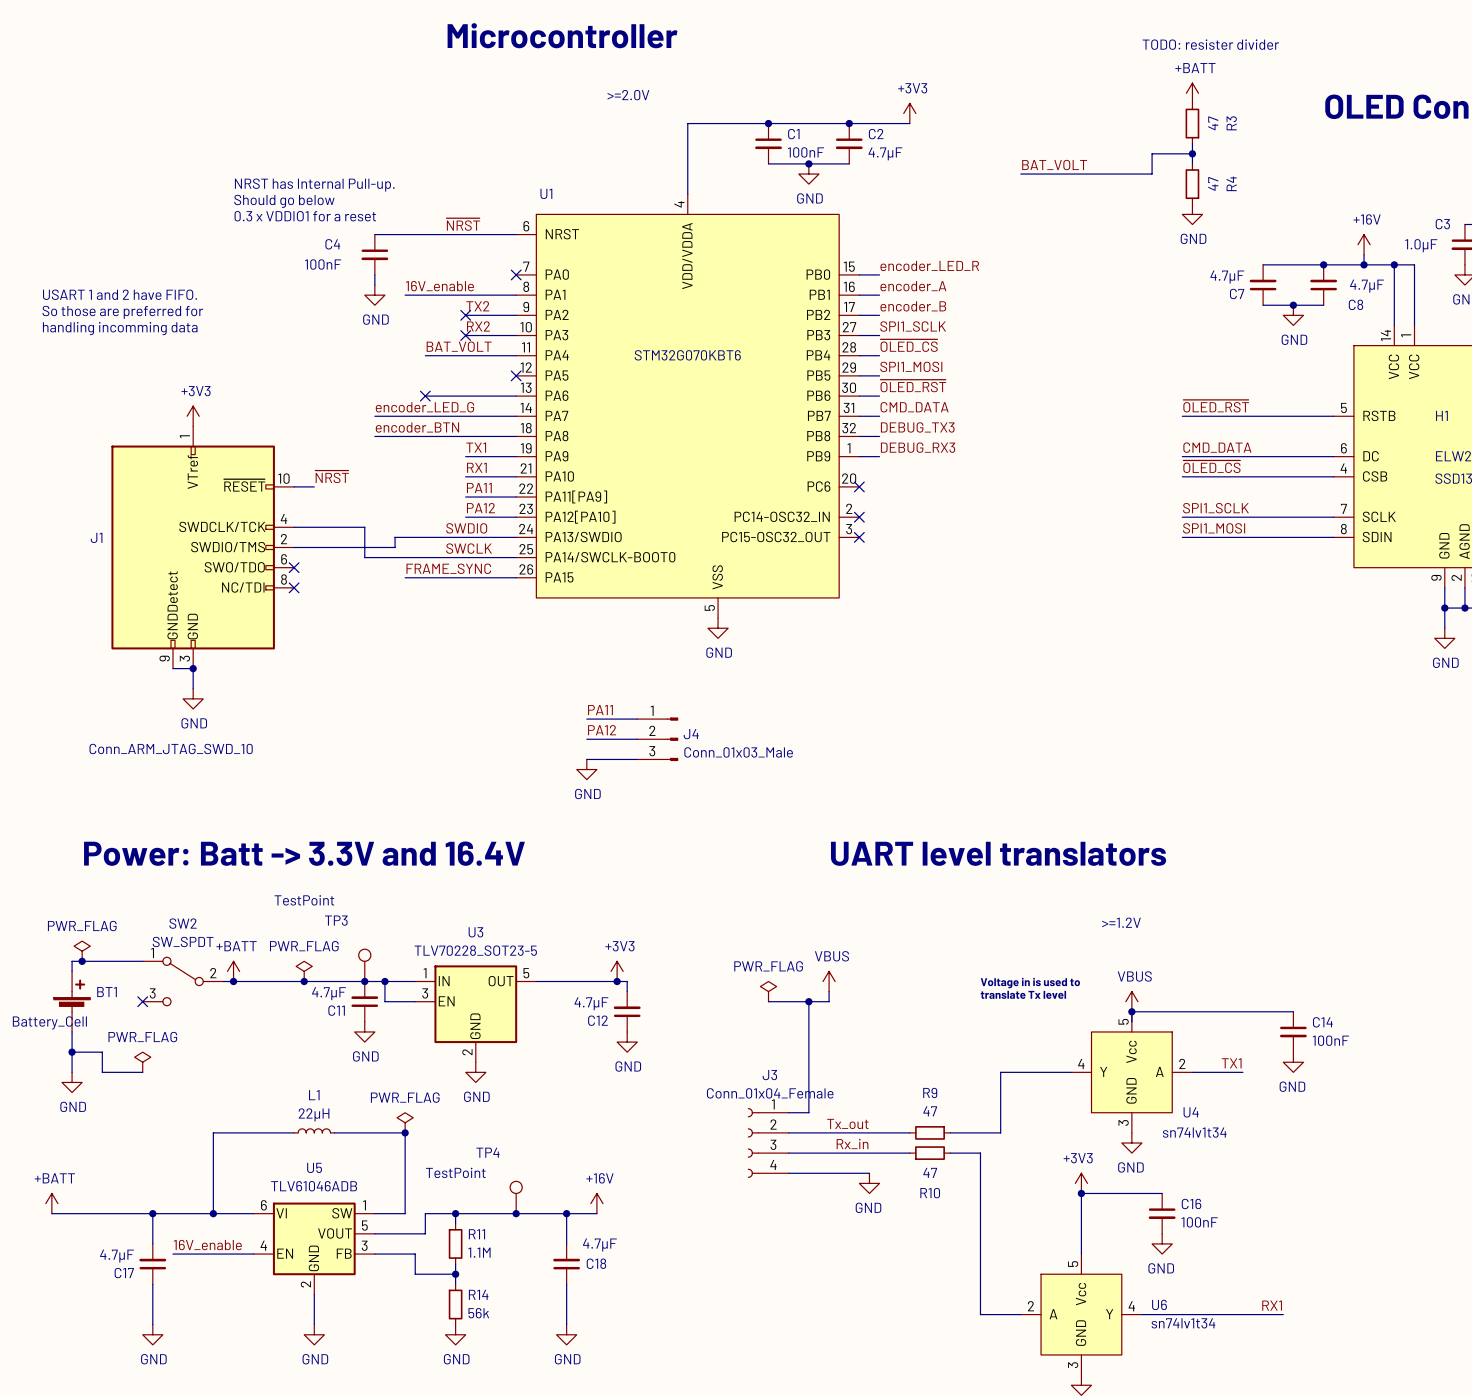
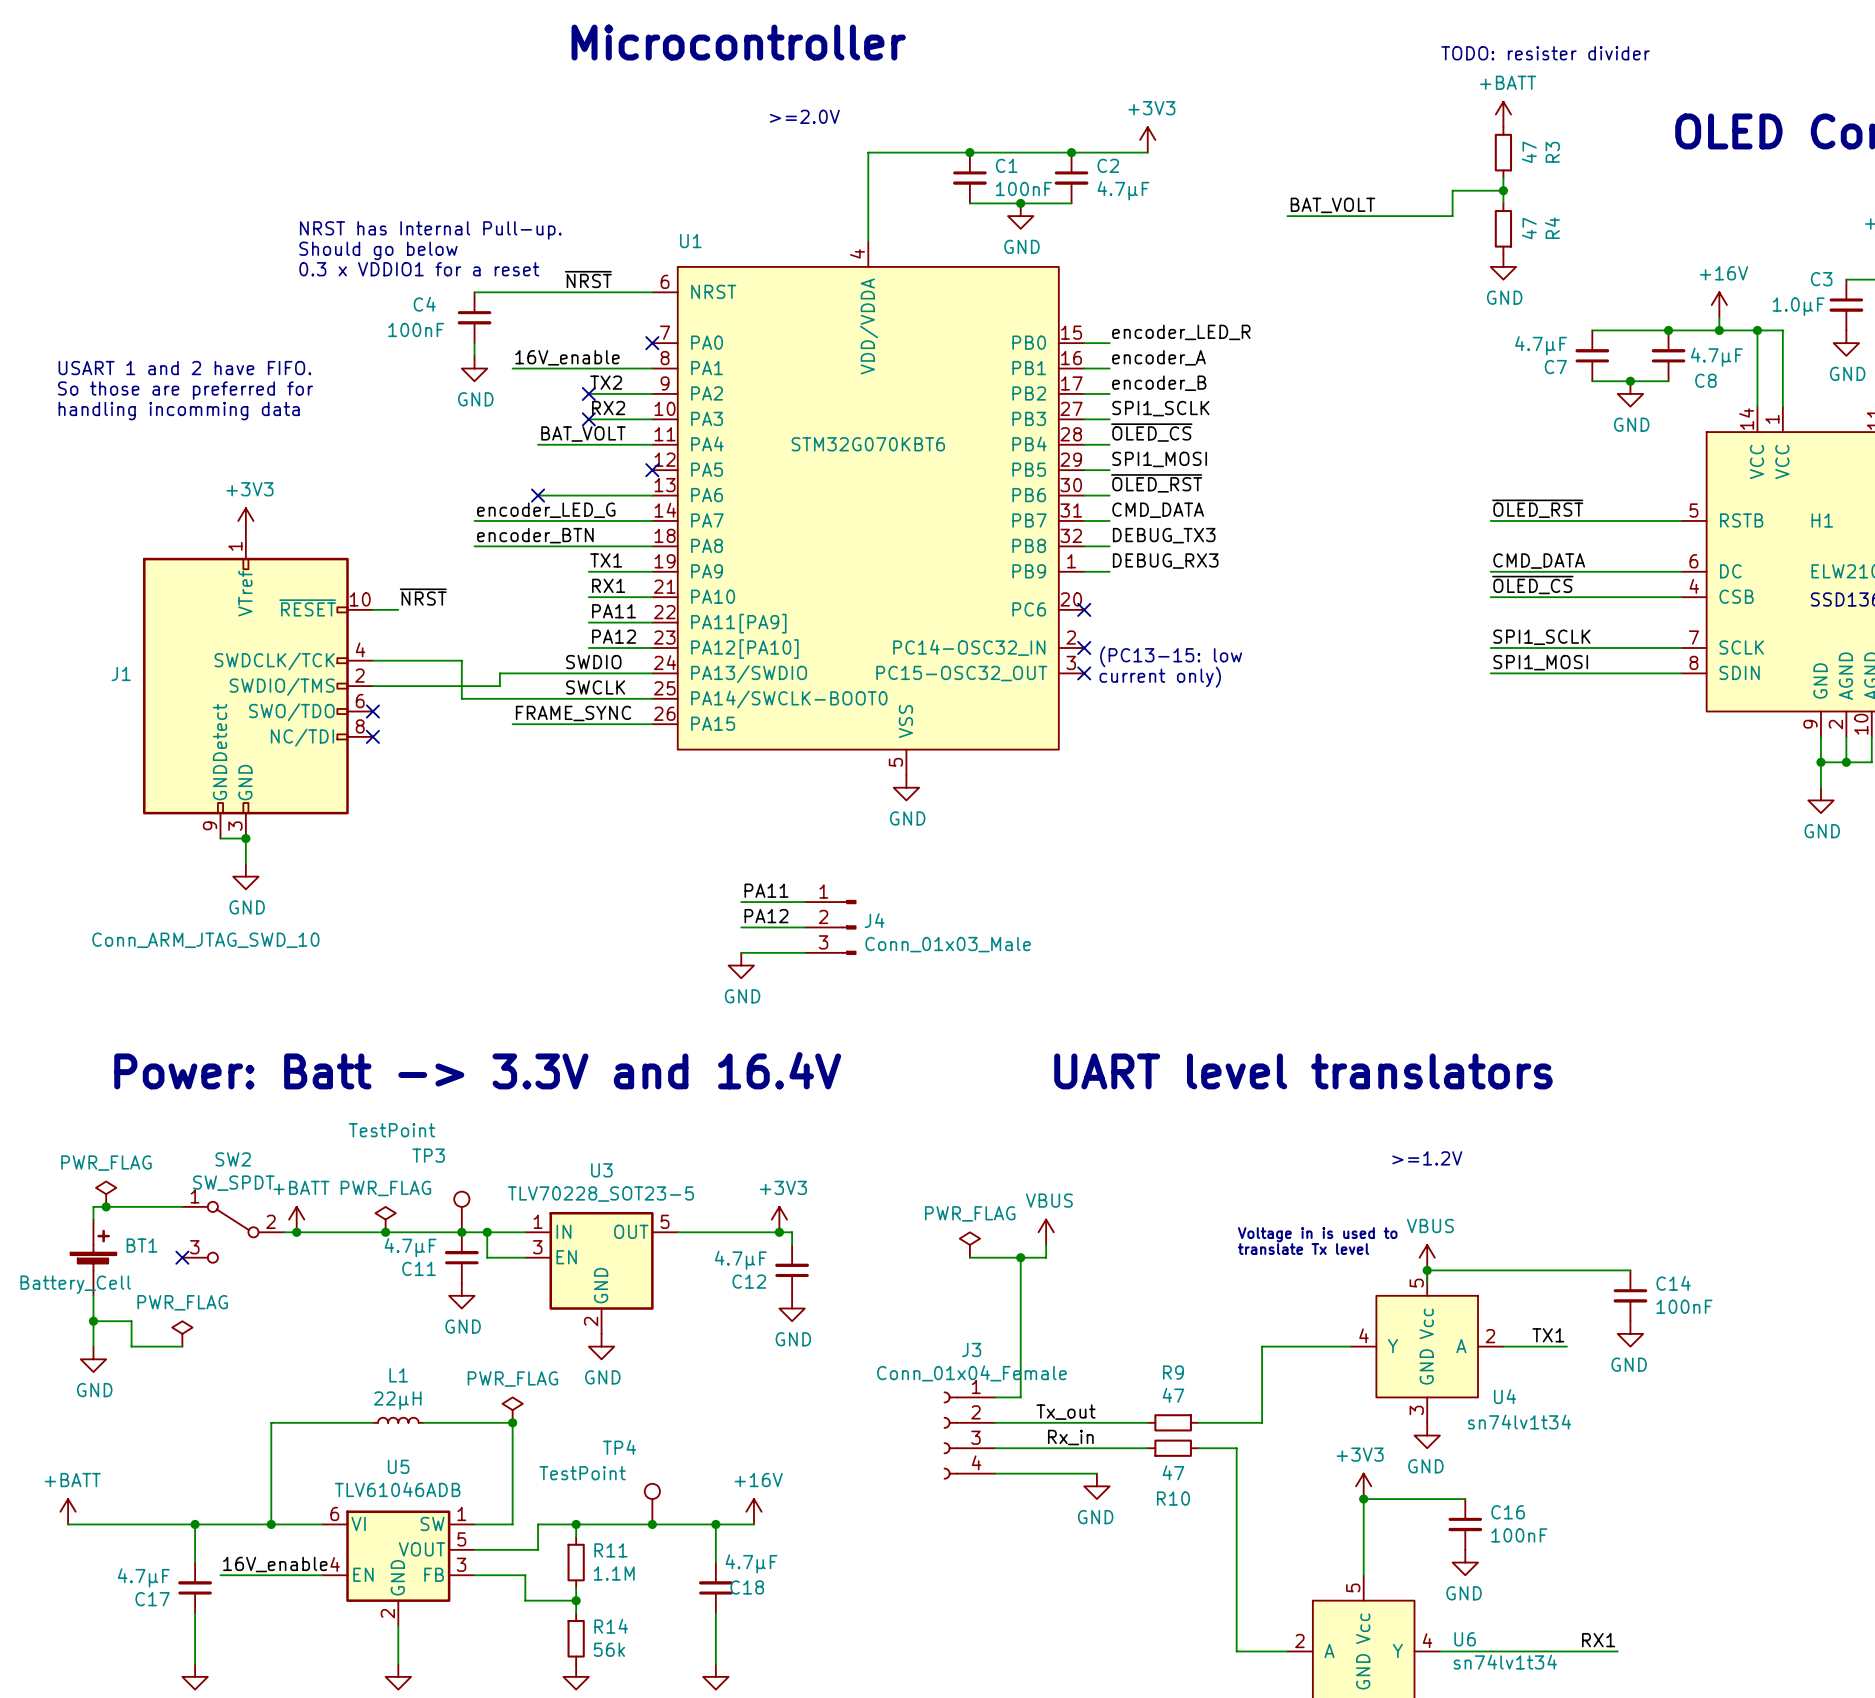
text: none -> (PC13-15: low (1171, 656)
text: none -> current only) (1160, 677)

